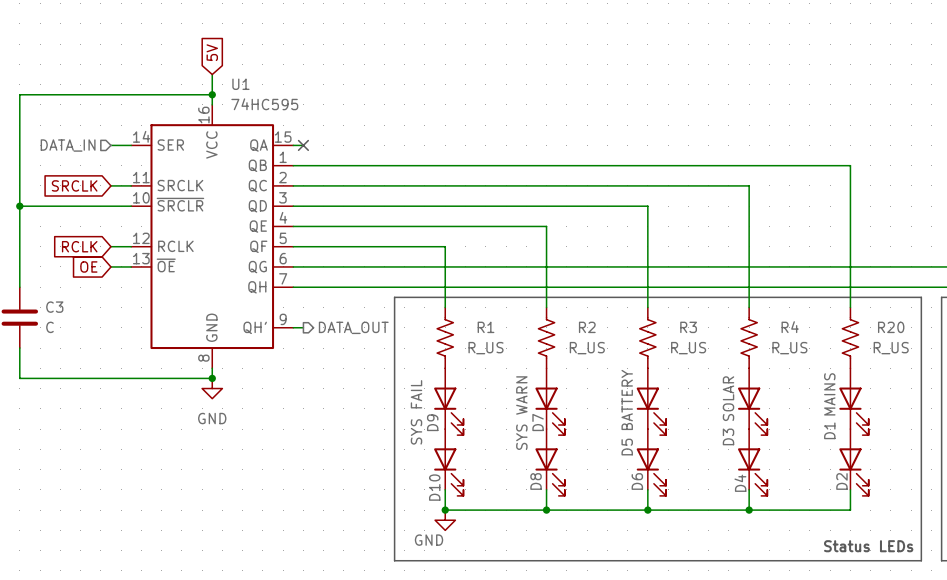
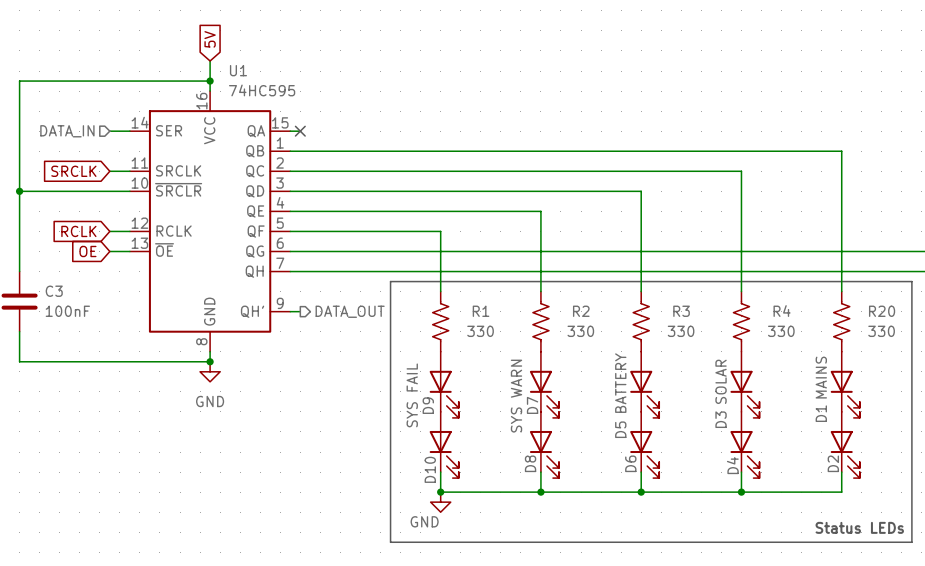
C3 value: C (49, 327) -> 100nF (67, 311)
R1 value: R_US (486, 348) -> 330 (480, 331)
R2 value: R_US (587, 348) -> 330 (580, 331)
R3 value: R_US (688, 348) -> 330 (681, 331)
R4 value: R_US (789, 348) -> 330 (781, 331)
R20 value: R_US (891, 348) -> 330 (881, 331)

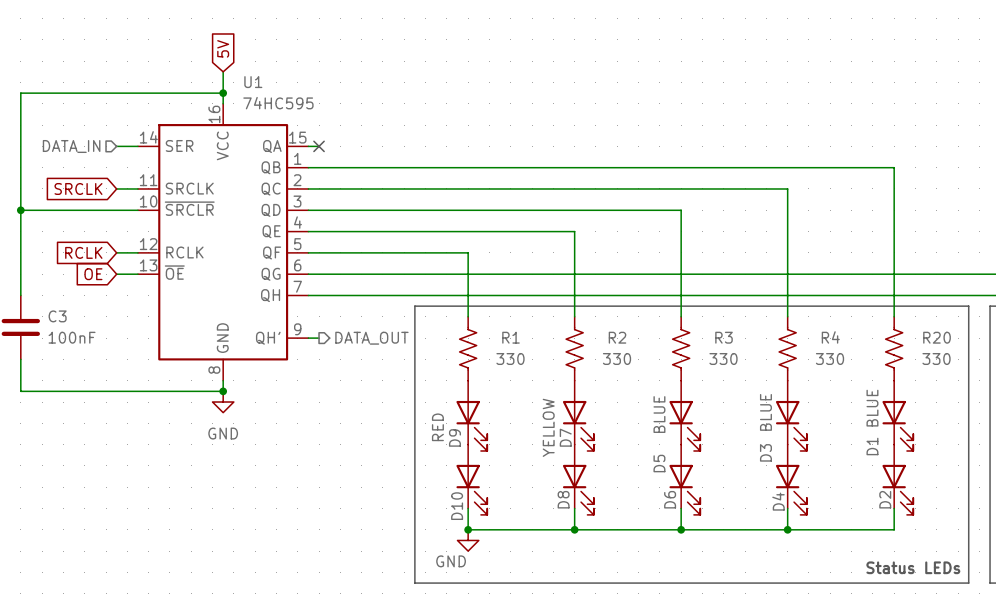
D1 value: MAINS (821, 377) -> BLUE (872, 408)
D3 value: SOLAR (721, 381) -> BLUE (765, 412)
D5 value: BATTERY (620, 383) -> BLUE (659, 414)
D9 value: SYS FAIL (412, 395) -> RED (437, 427)
D7 value: SYS WARN (516, 396) -> YELLOW (548, 427)

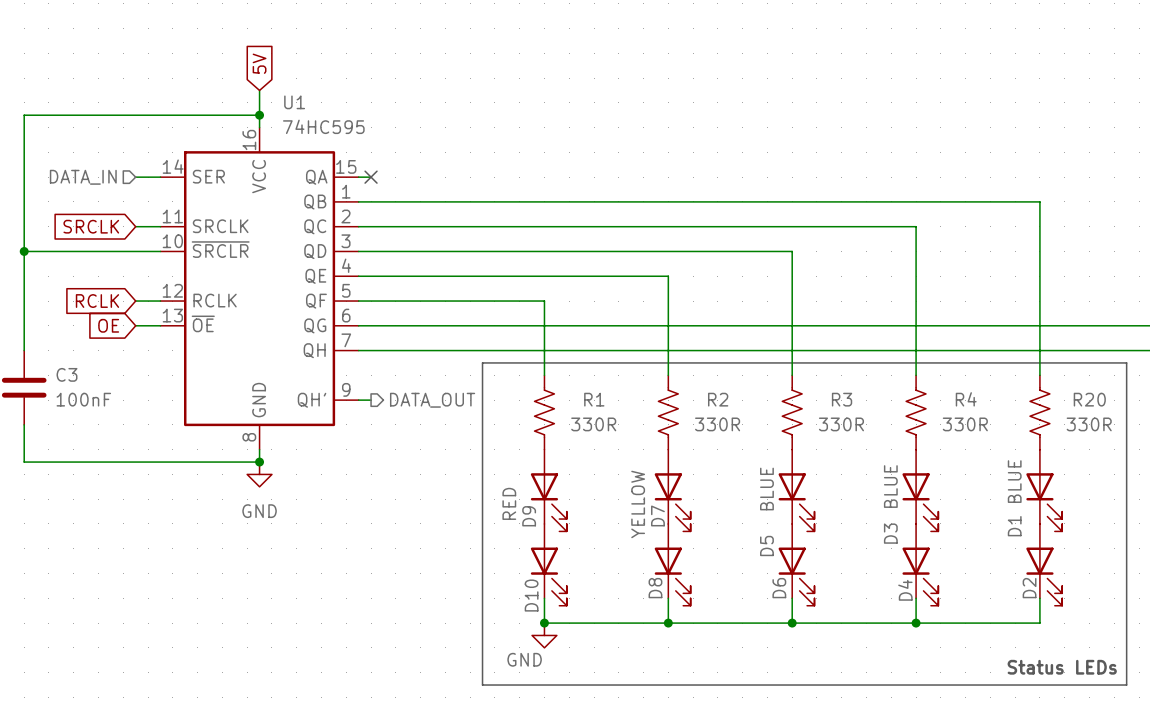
R1 value: 330 (510, 359) -> 330R (593, 424)
R2 value: 330 (616, 359) -> 330R (717, 424)
R3 value: 330 (723, 359) -> 330R (841, 424)
R4 value: 330 (830, 359) -> 330R (965, 424)
R20 value: 330 (936, 359) -> 330R (1089, 424)

